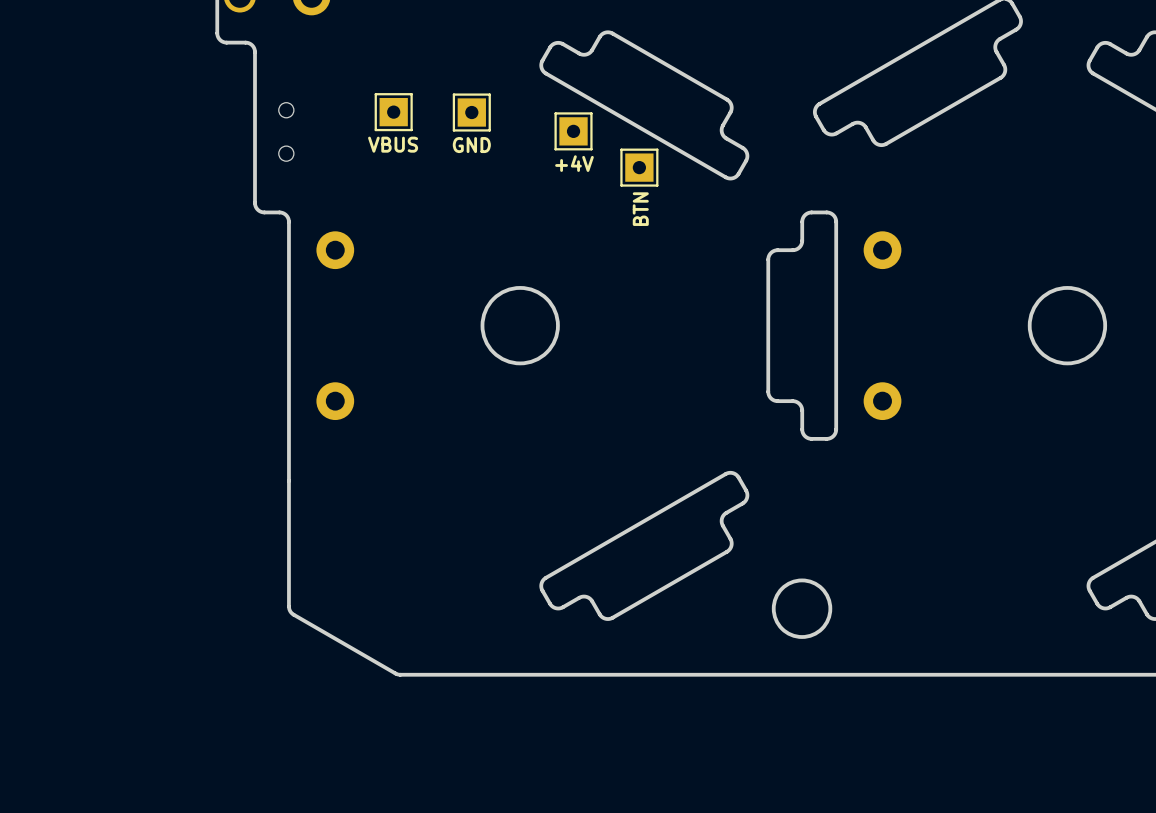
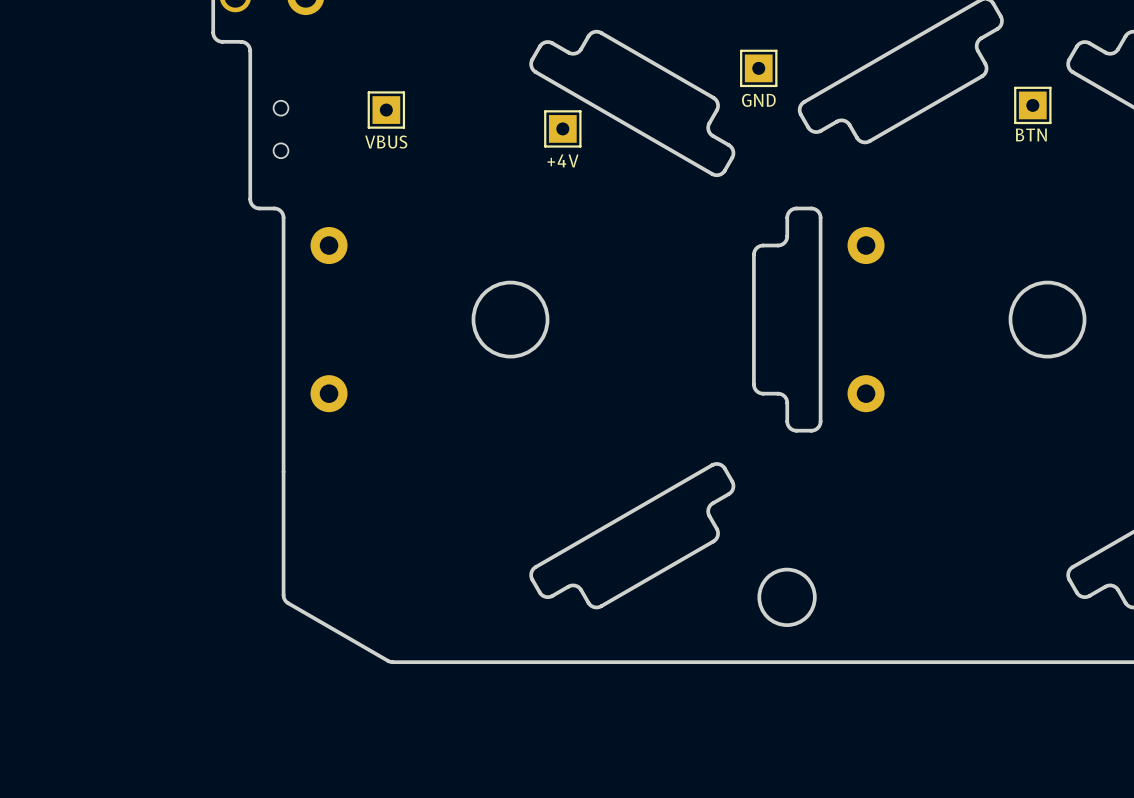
part position: (471, 112) -> (758, 68)
part position: (639, 167) -> (1032, 105)
part value rotation: 0° (640, 209) -> 90° clockwise (1031, 134)

